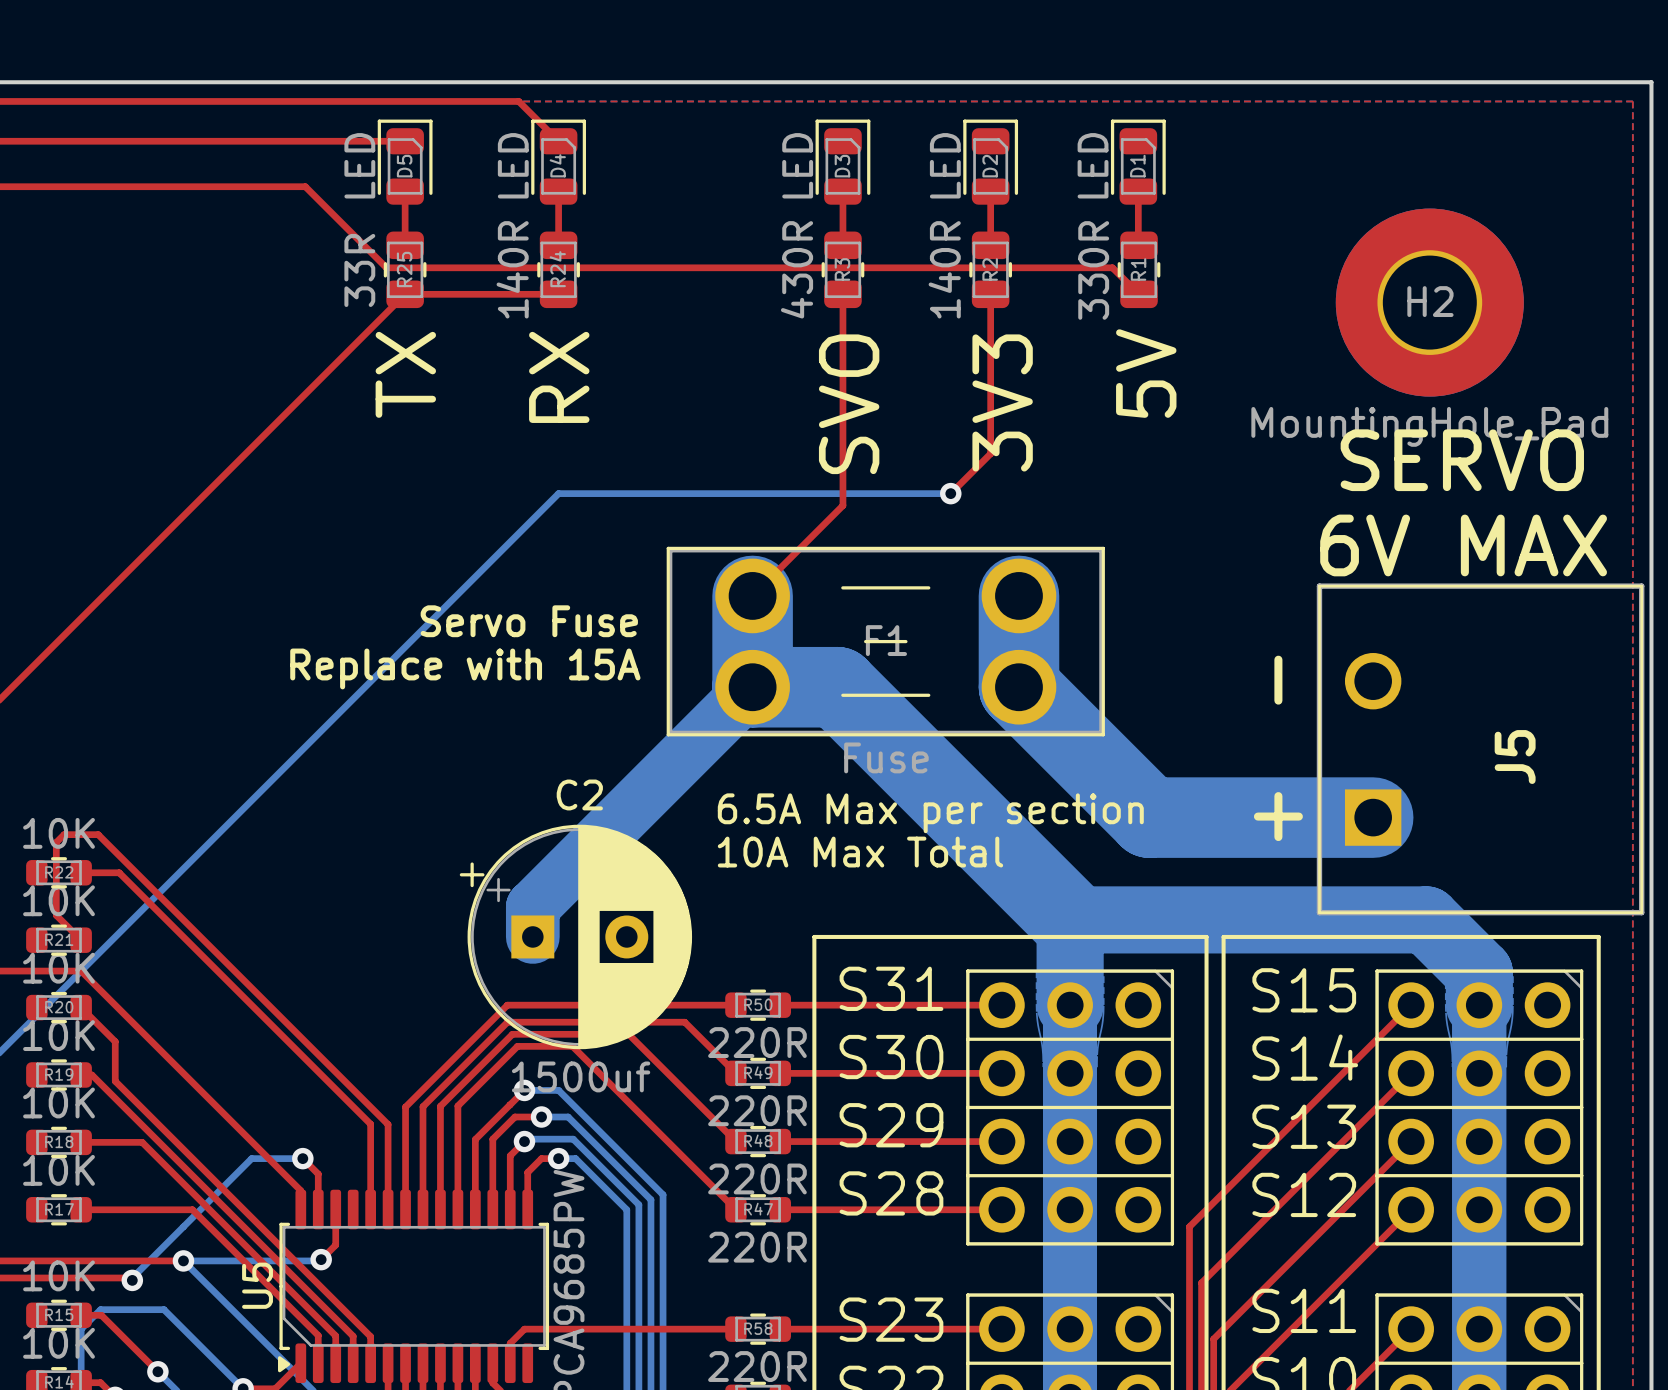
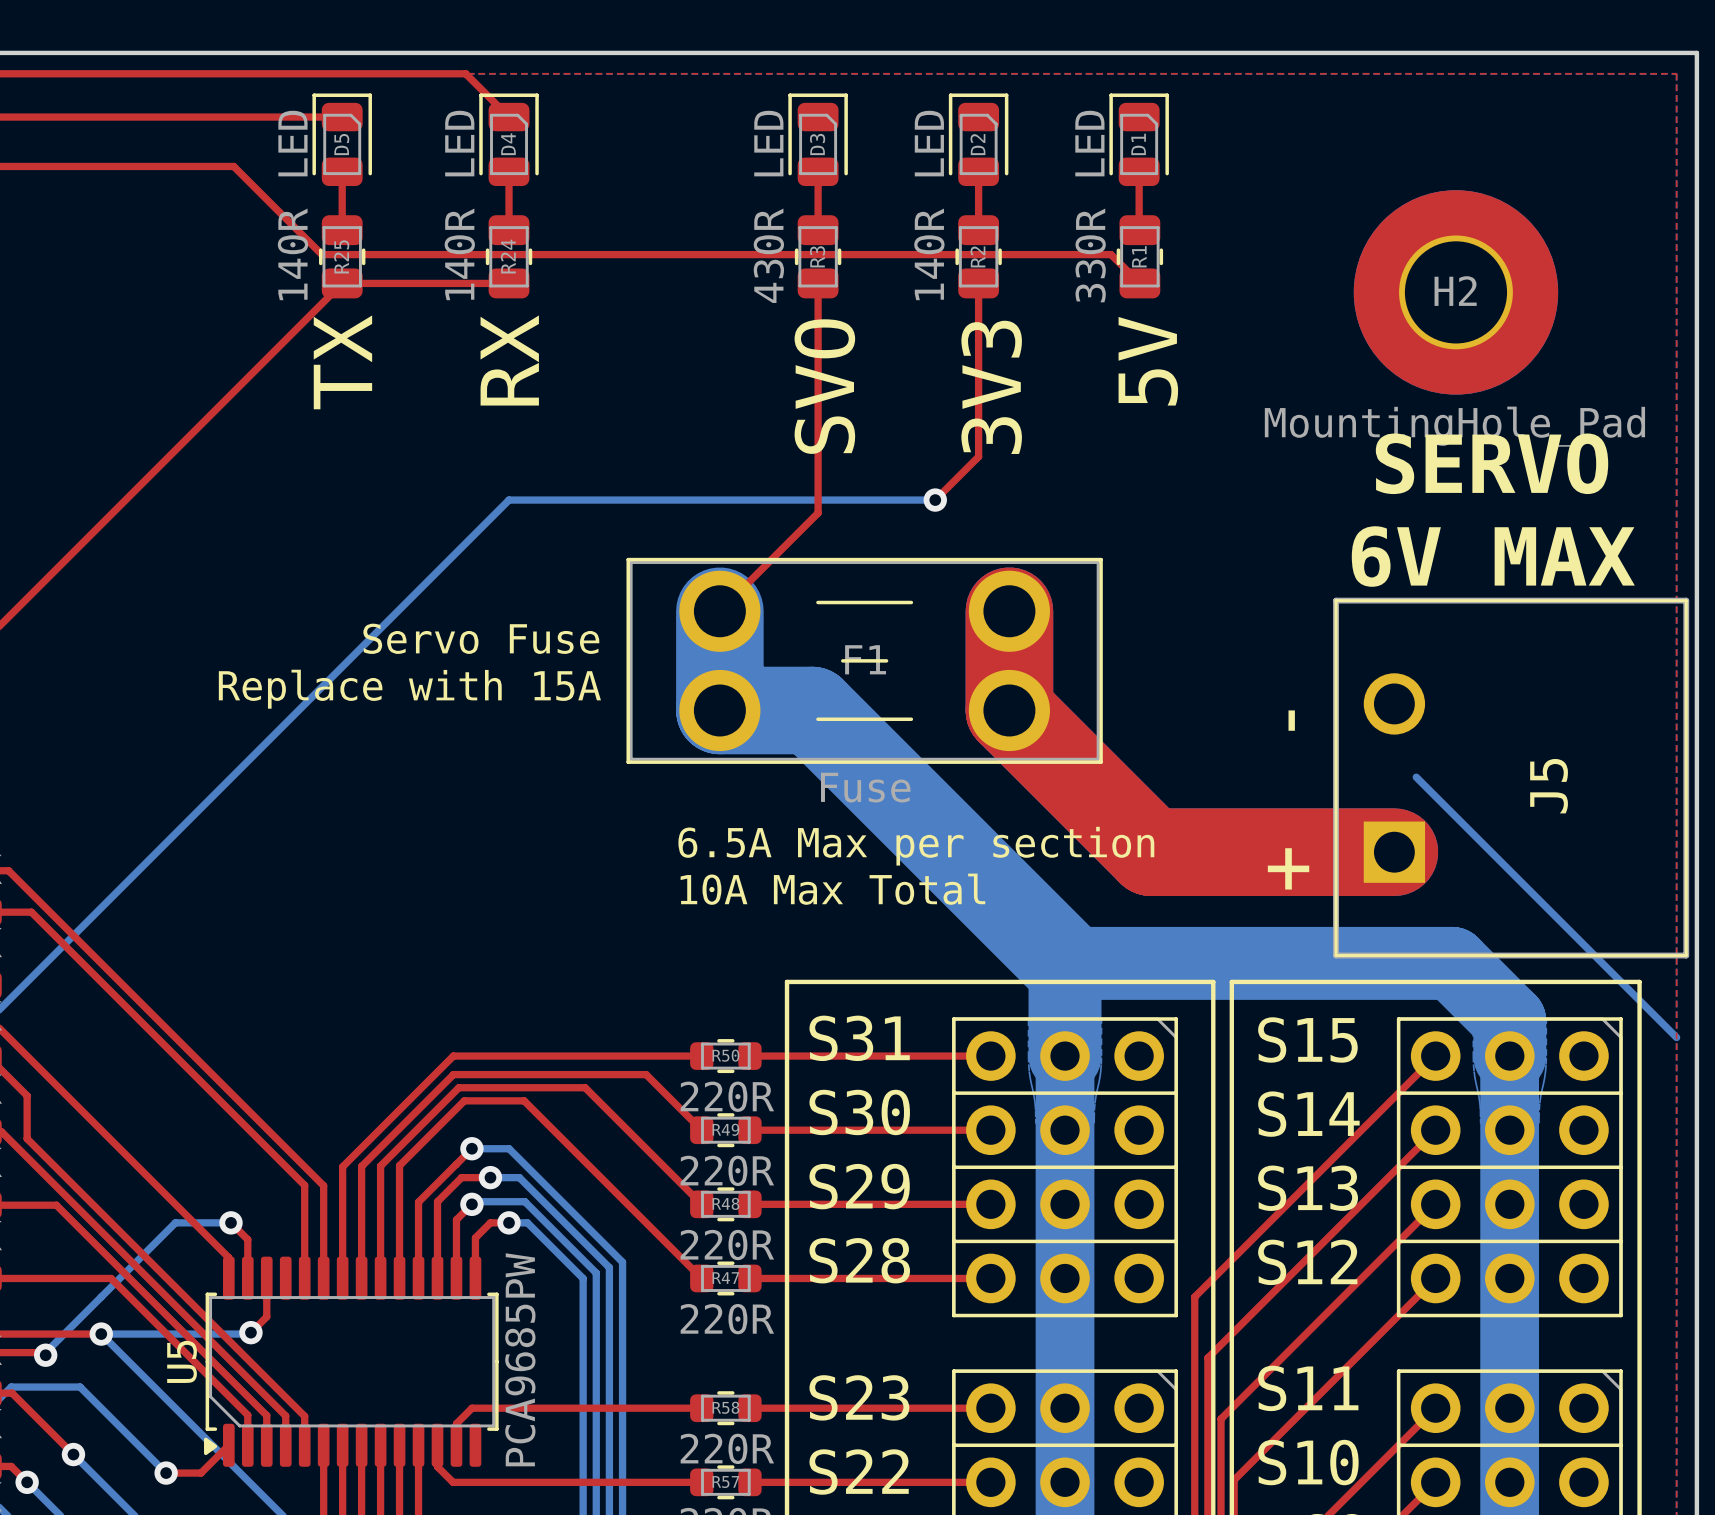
R25 value: 33R (359, 270) -> 140R (292, 254)
top track: none -> (1009, 611) (1009, 710) (1151, 852) (1394, 852)
bottom track: (752, 687) (532, 907) (532, 936) -> none
bottom track: none -> (1416, 777) (1676, 1037)
C2: 1500uf (575, 936) -> none

